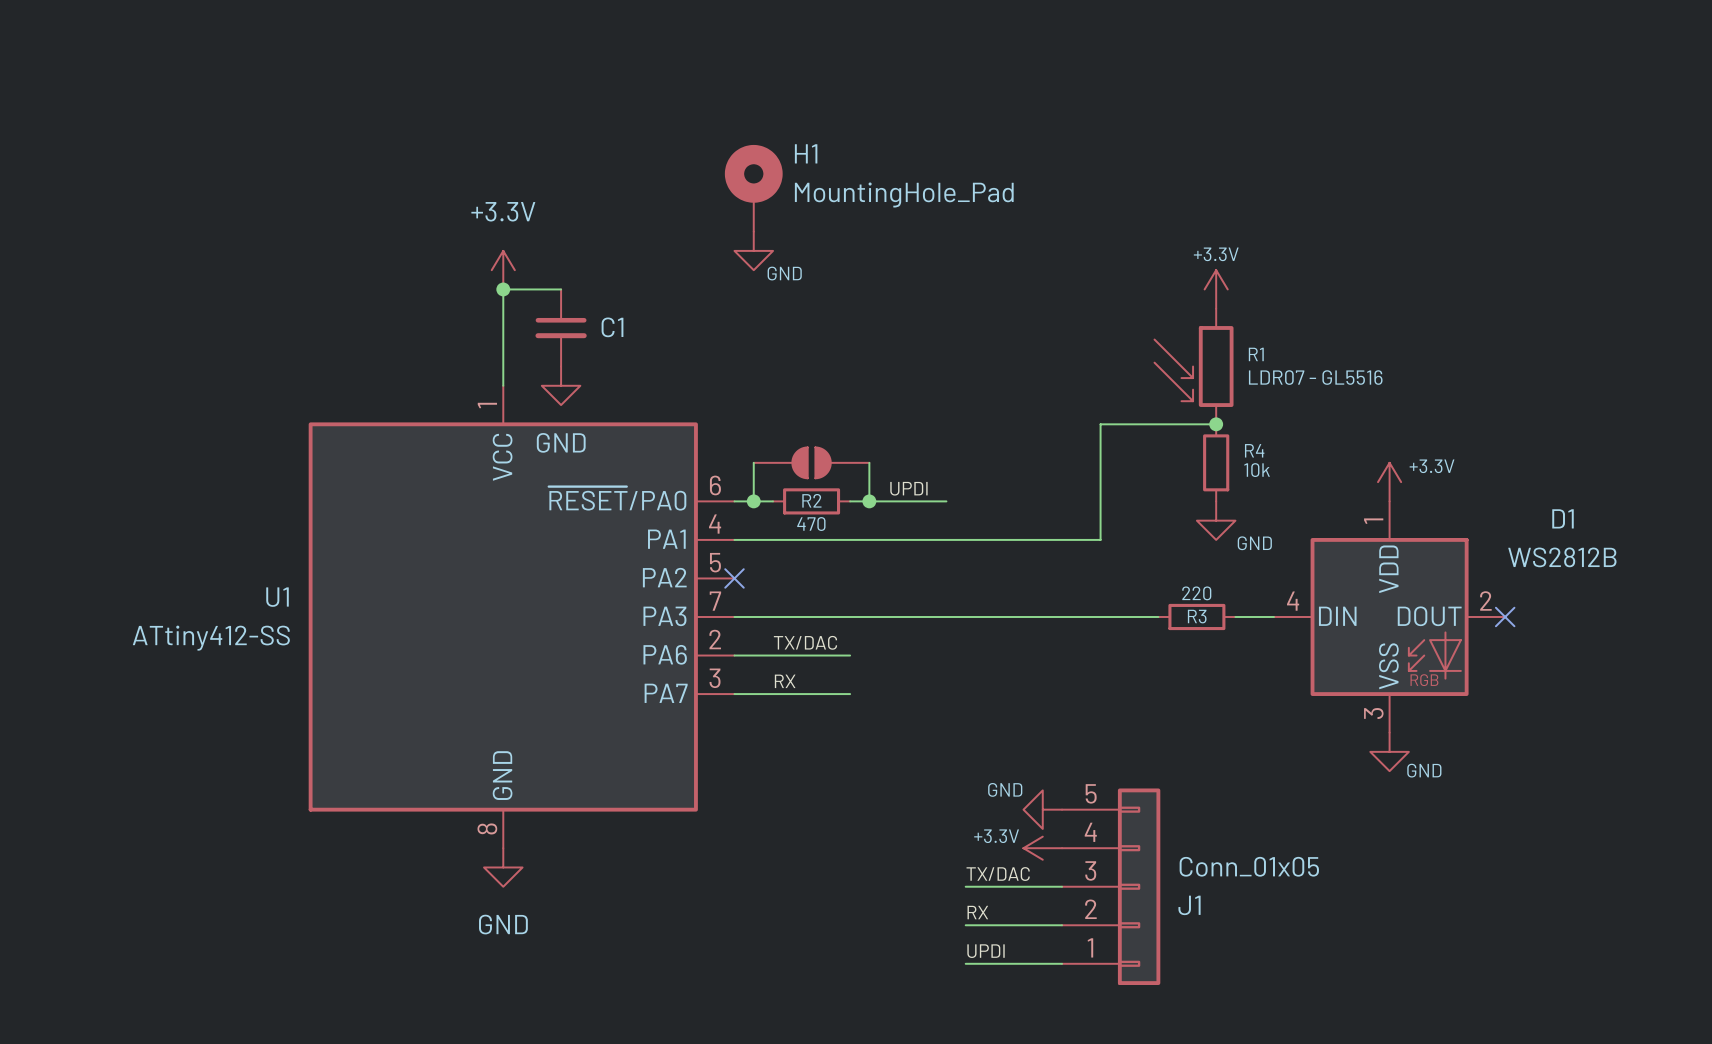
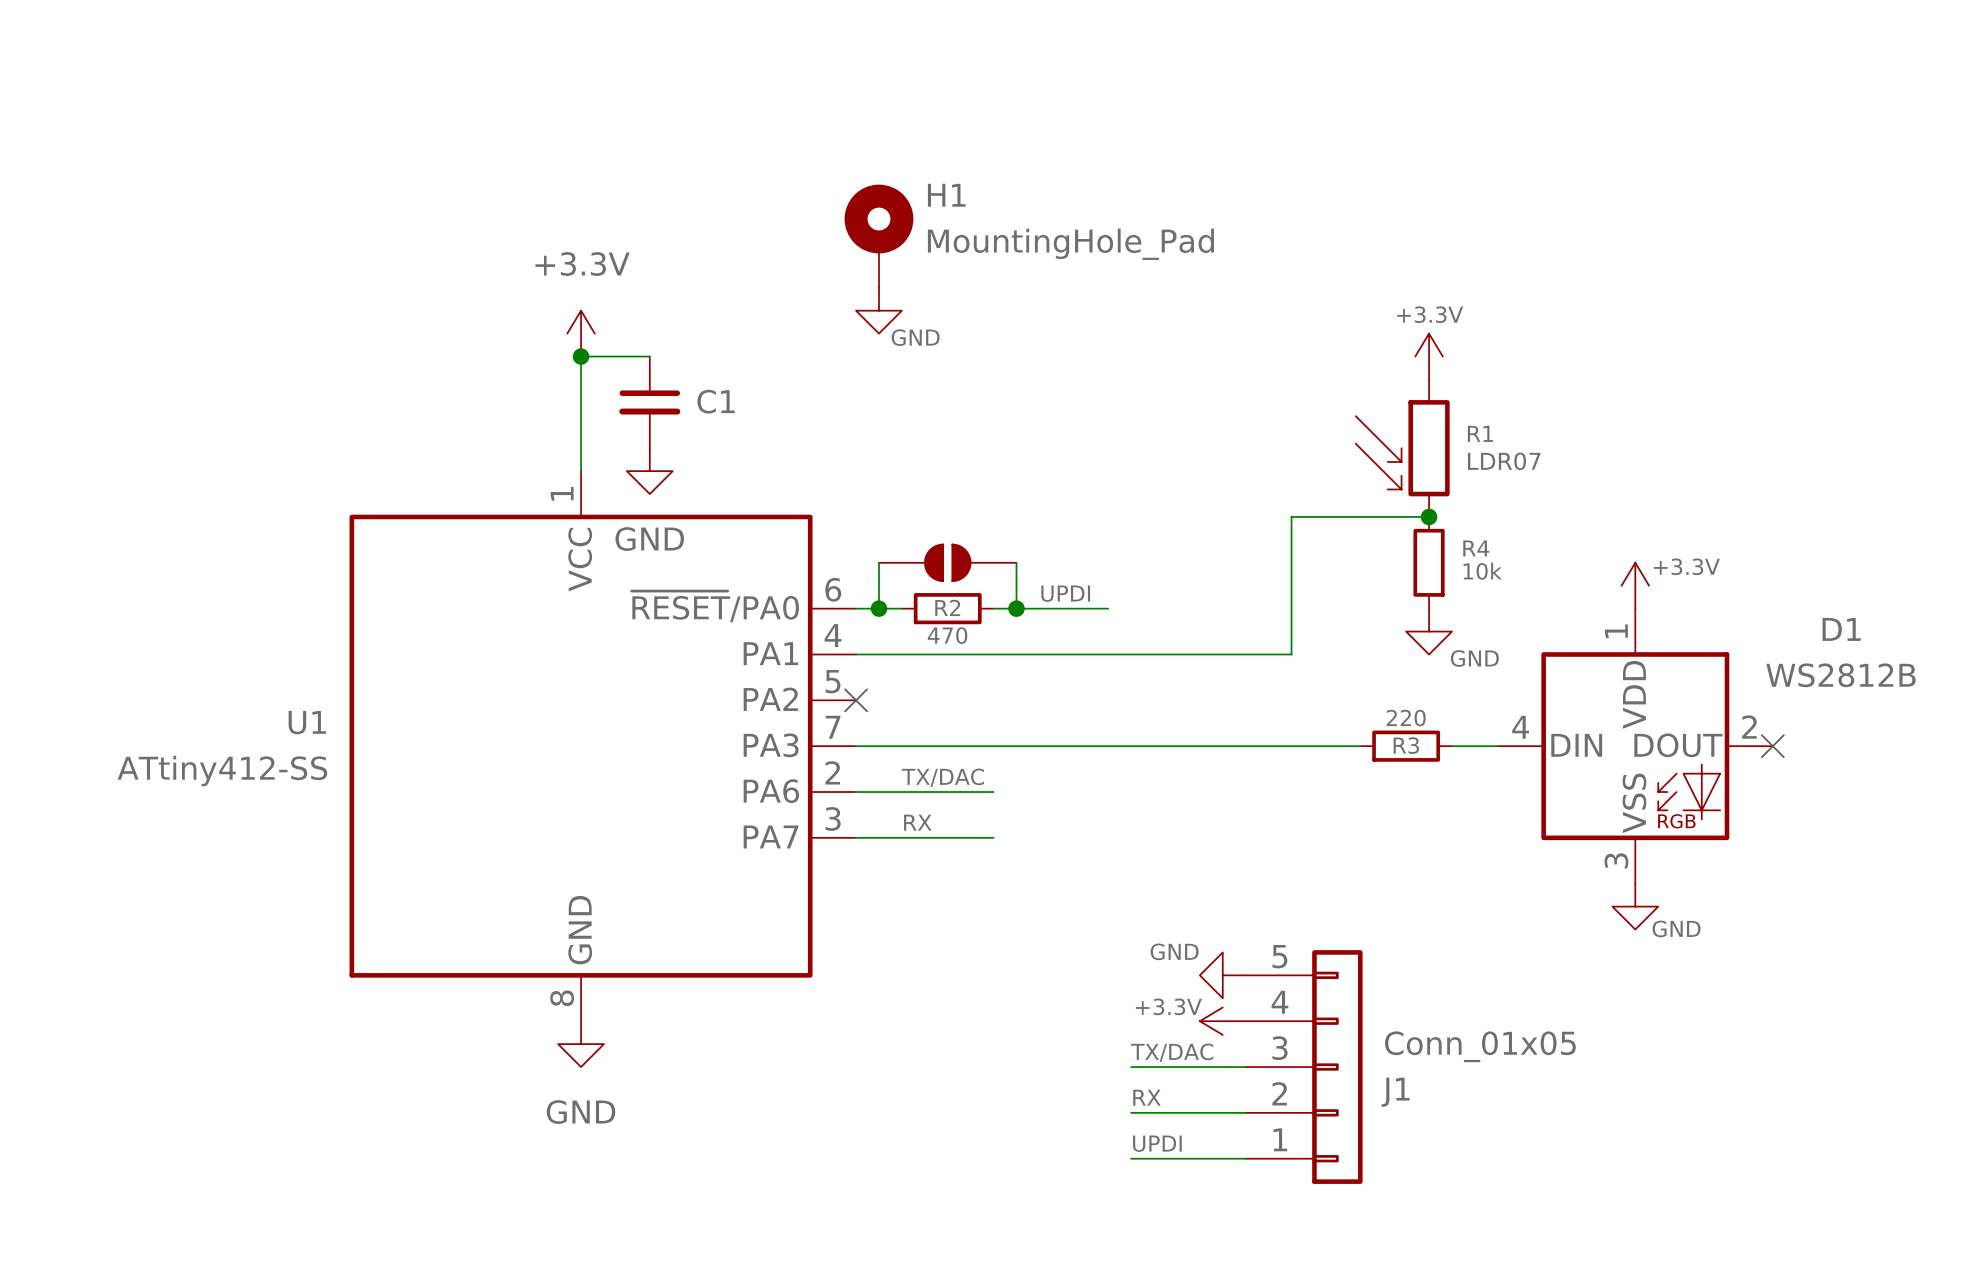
R1 value: LDR07 - GL5516 (1315, 377) -> LDR07 (1504, 461)

